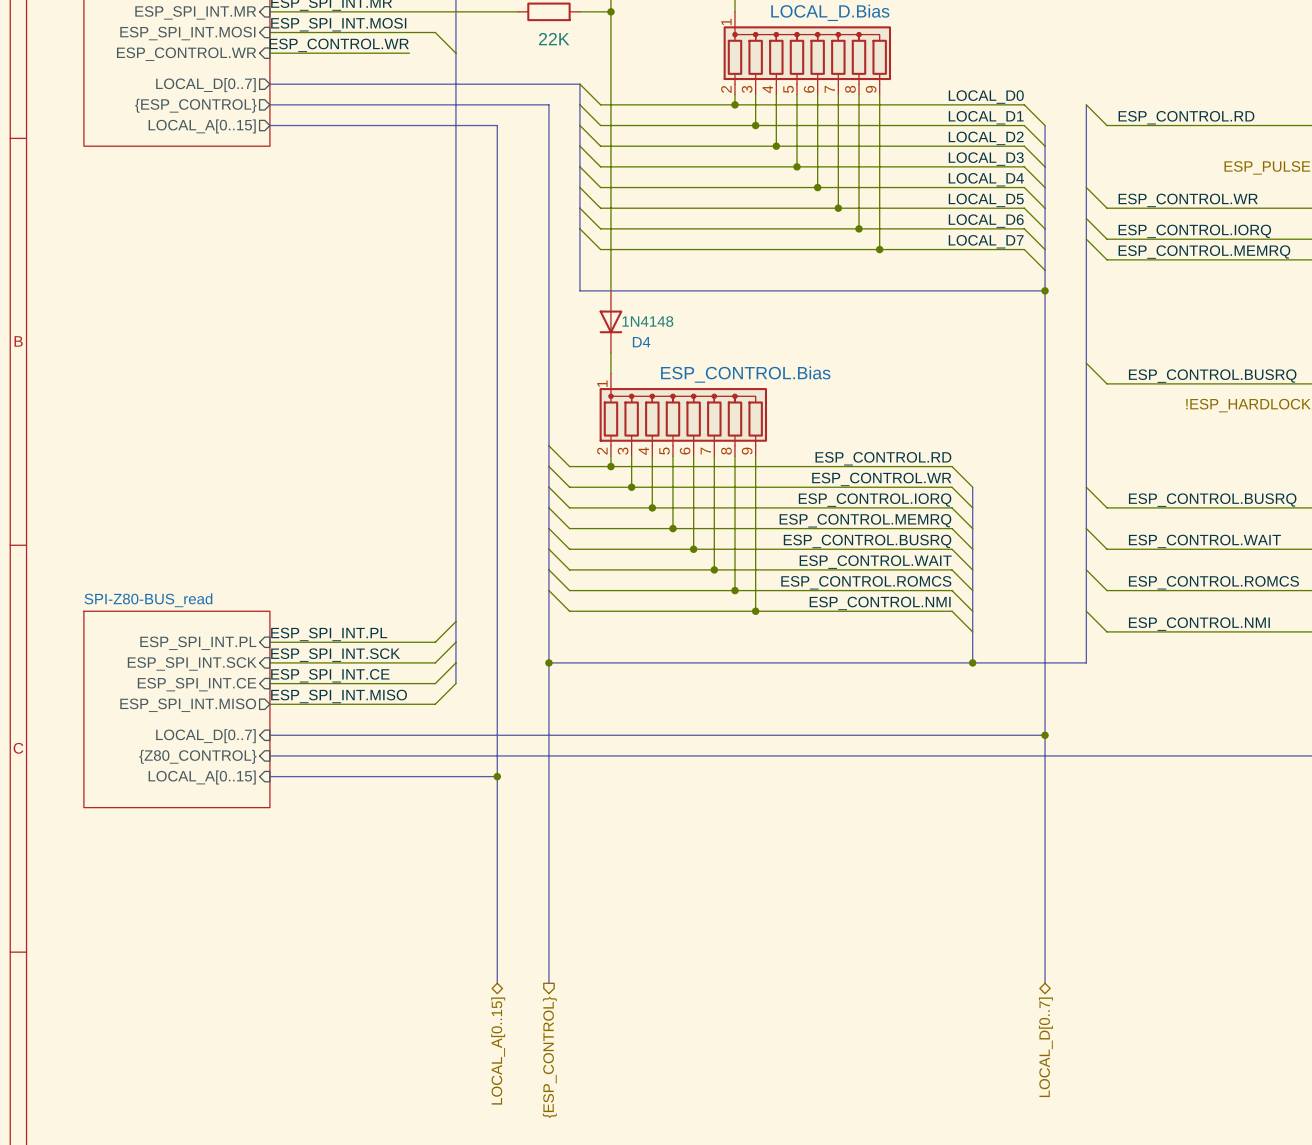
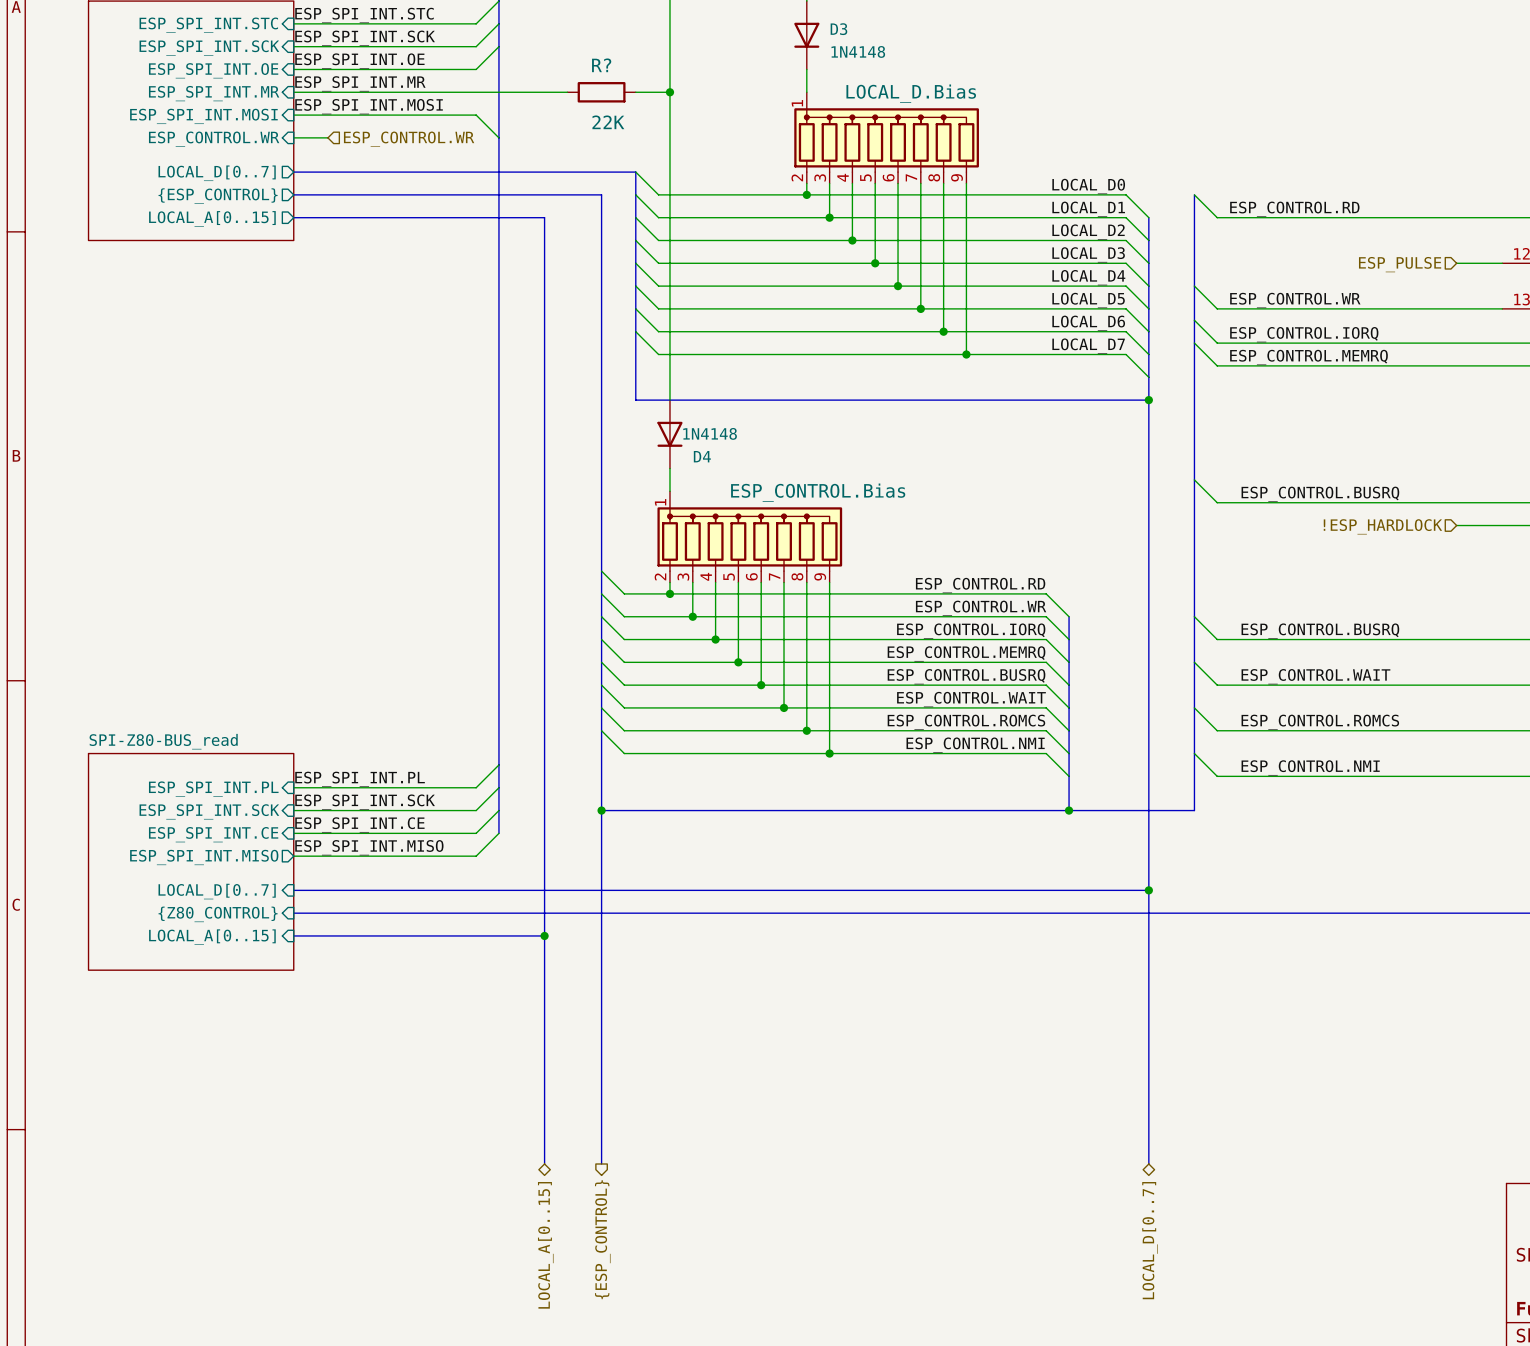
label: ESP_CONTROL.WR (339, 45) -> none
wire: (300, 53) (409, 53) -> none
hierarchical label: none -> ESP_CONTROL.WR (409, 139)

